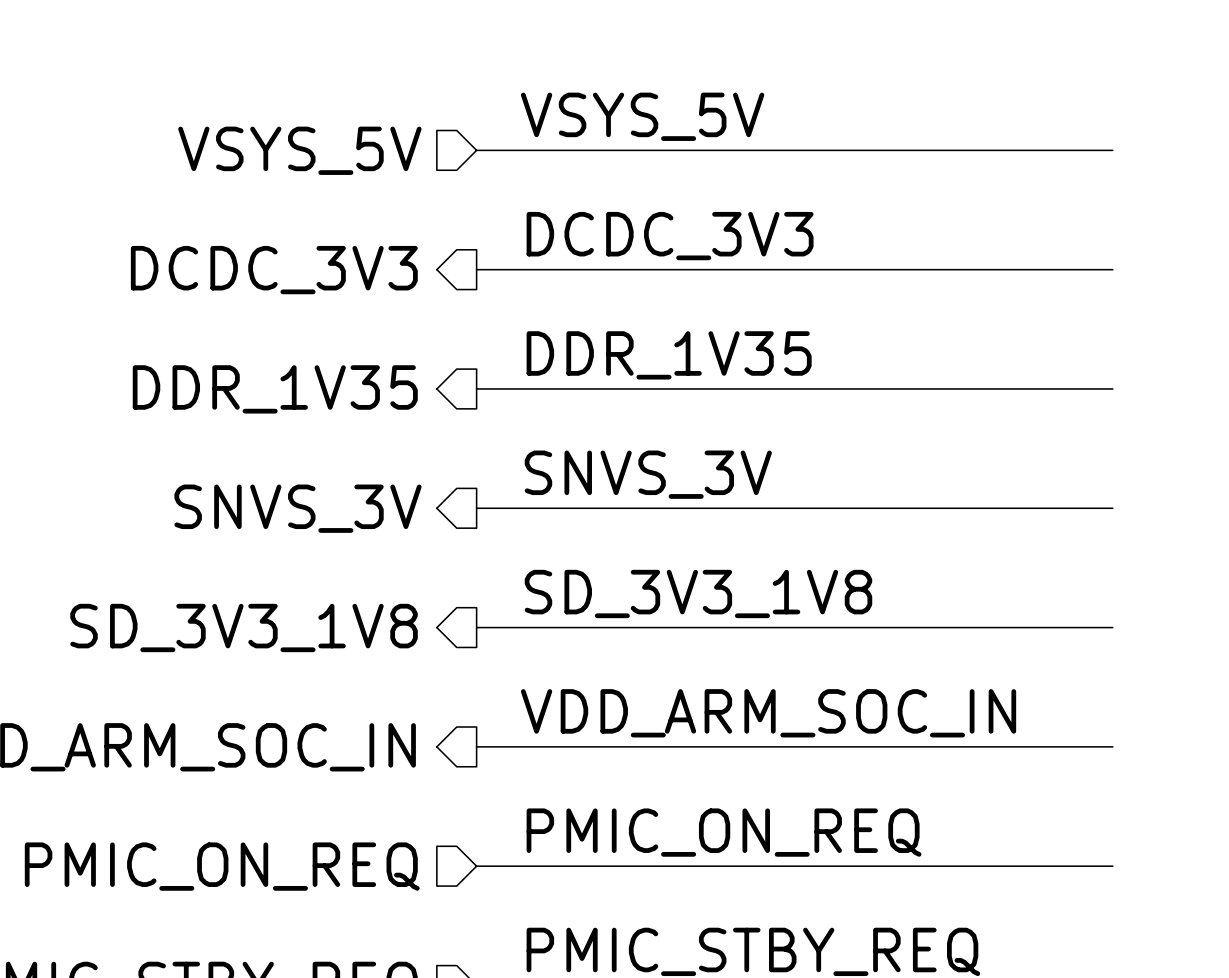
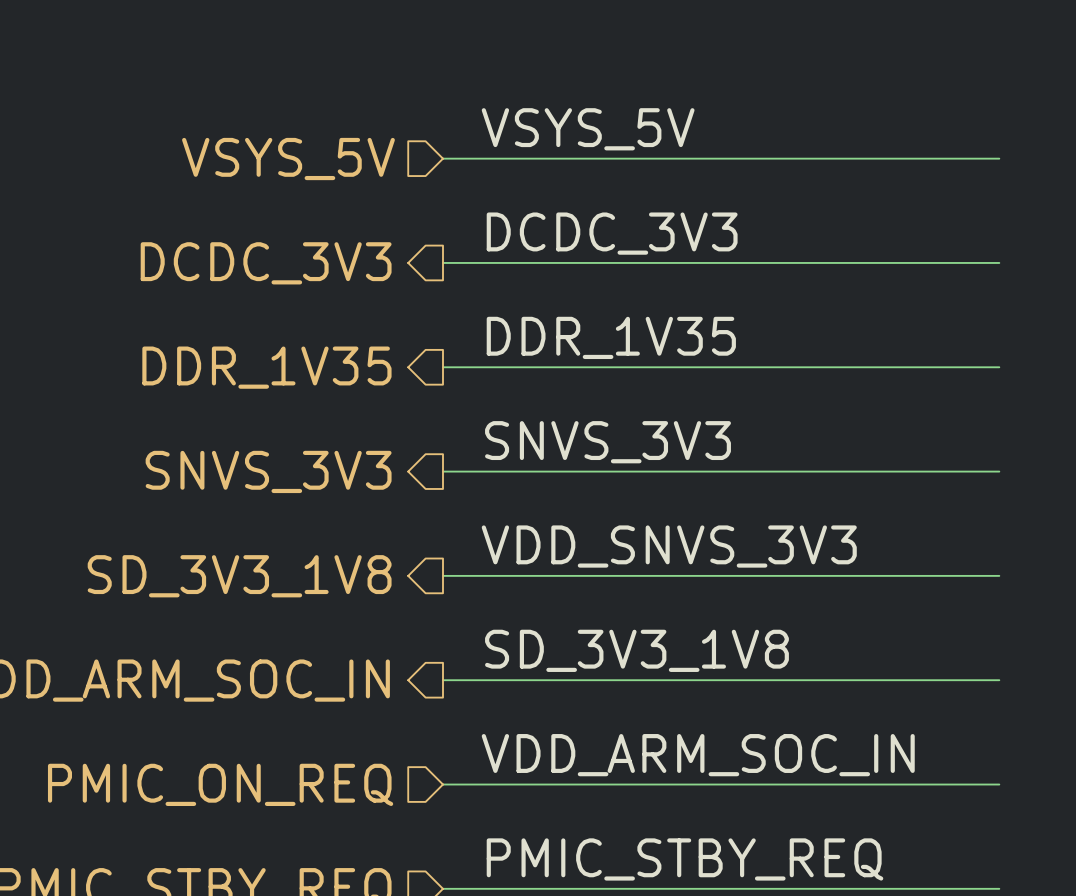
label: SNVS_3V (648, 474) -> SNVS_3V3 (608, 442)
hierarchical label: SNVS_3V (297, 508) -> SNVS_3V3 (268, 471)
label: SD_3V3_1V8 (698, 593) -> VDD_SNVS_3V3 (669, 546)
label: VDD_ARM_SOC_IN (768, 713) -> SD_3V3_1V8 (636, 650)
label: PMIC_ON_REQ (724, 832) -> VDD_ARM_SOC_IN (698, 755)

